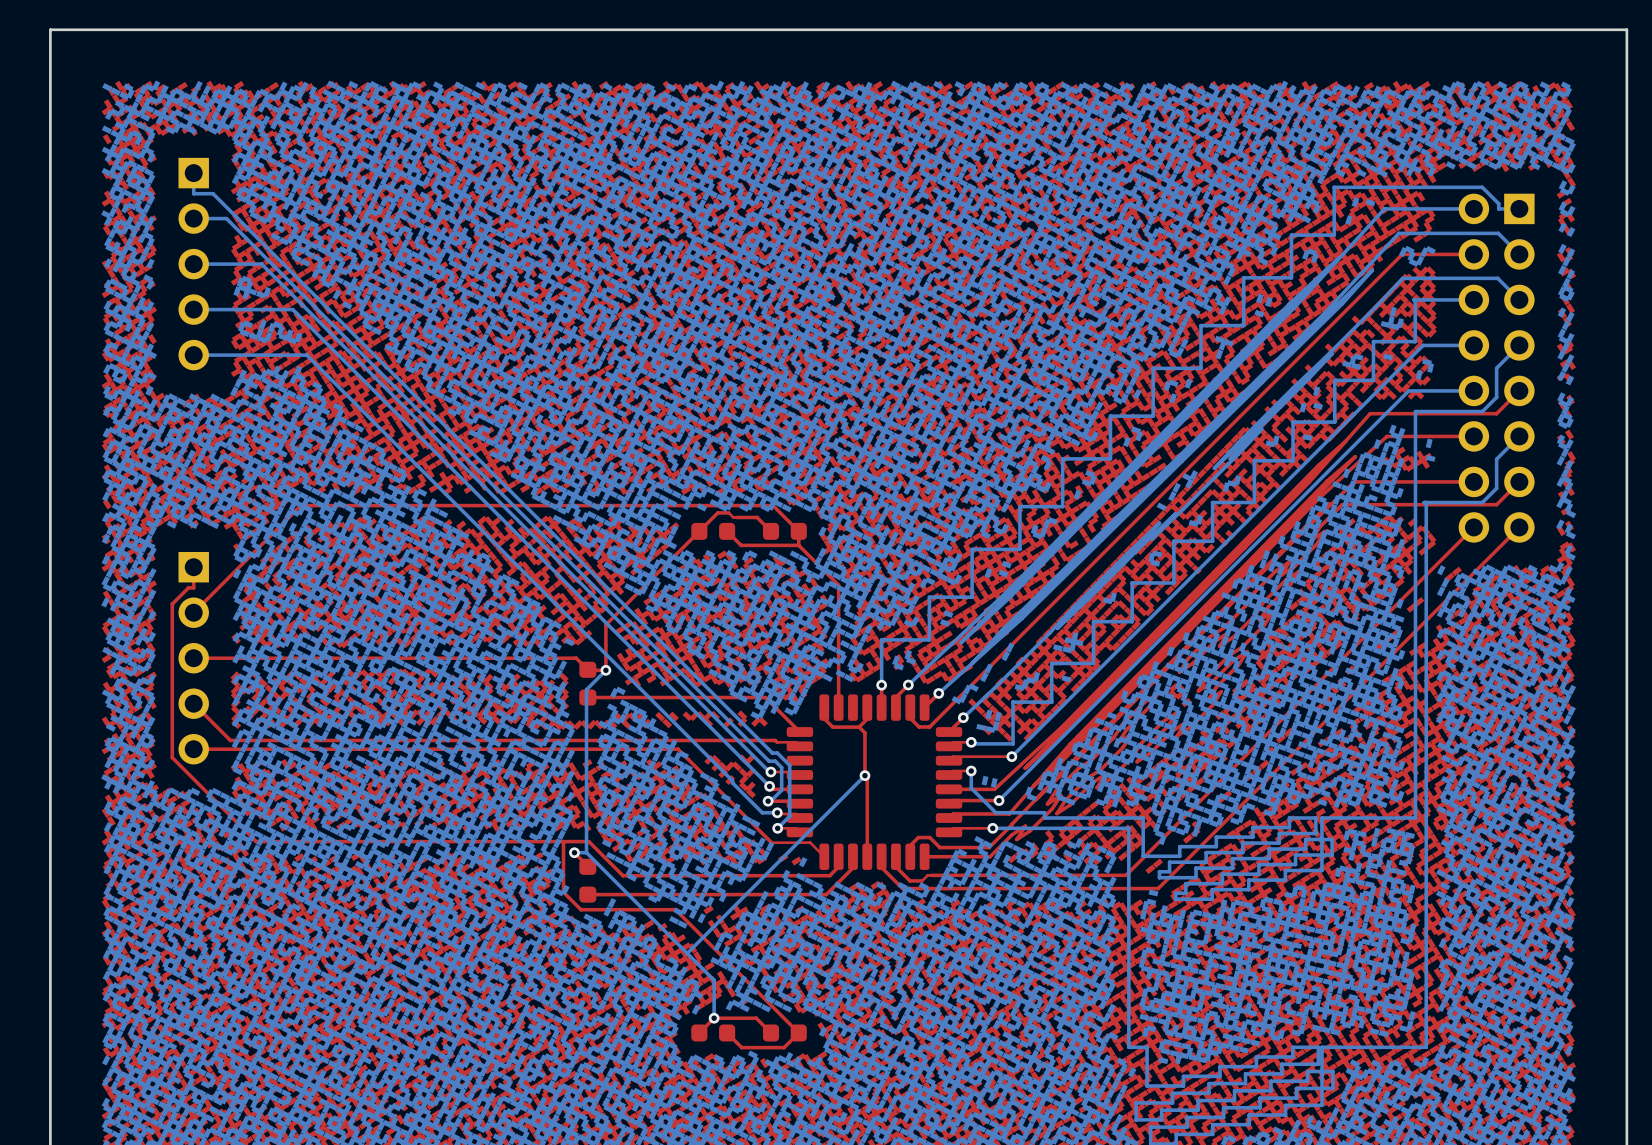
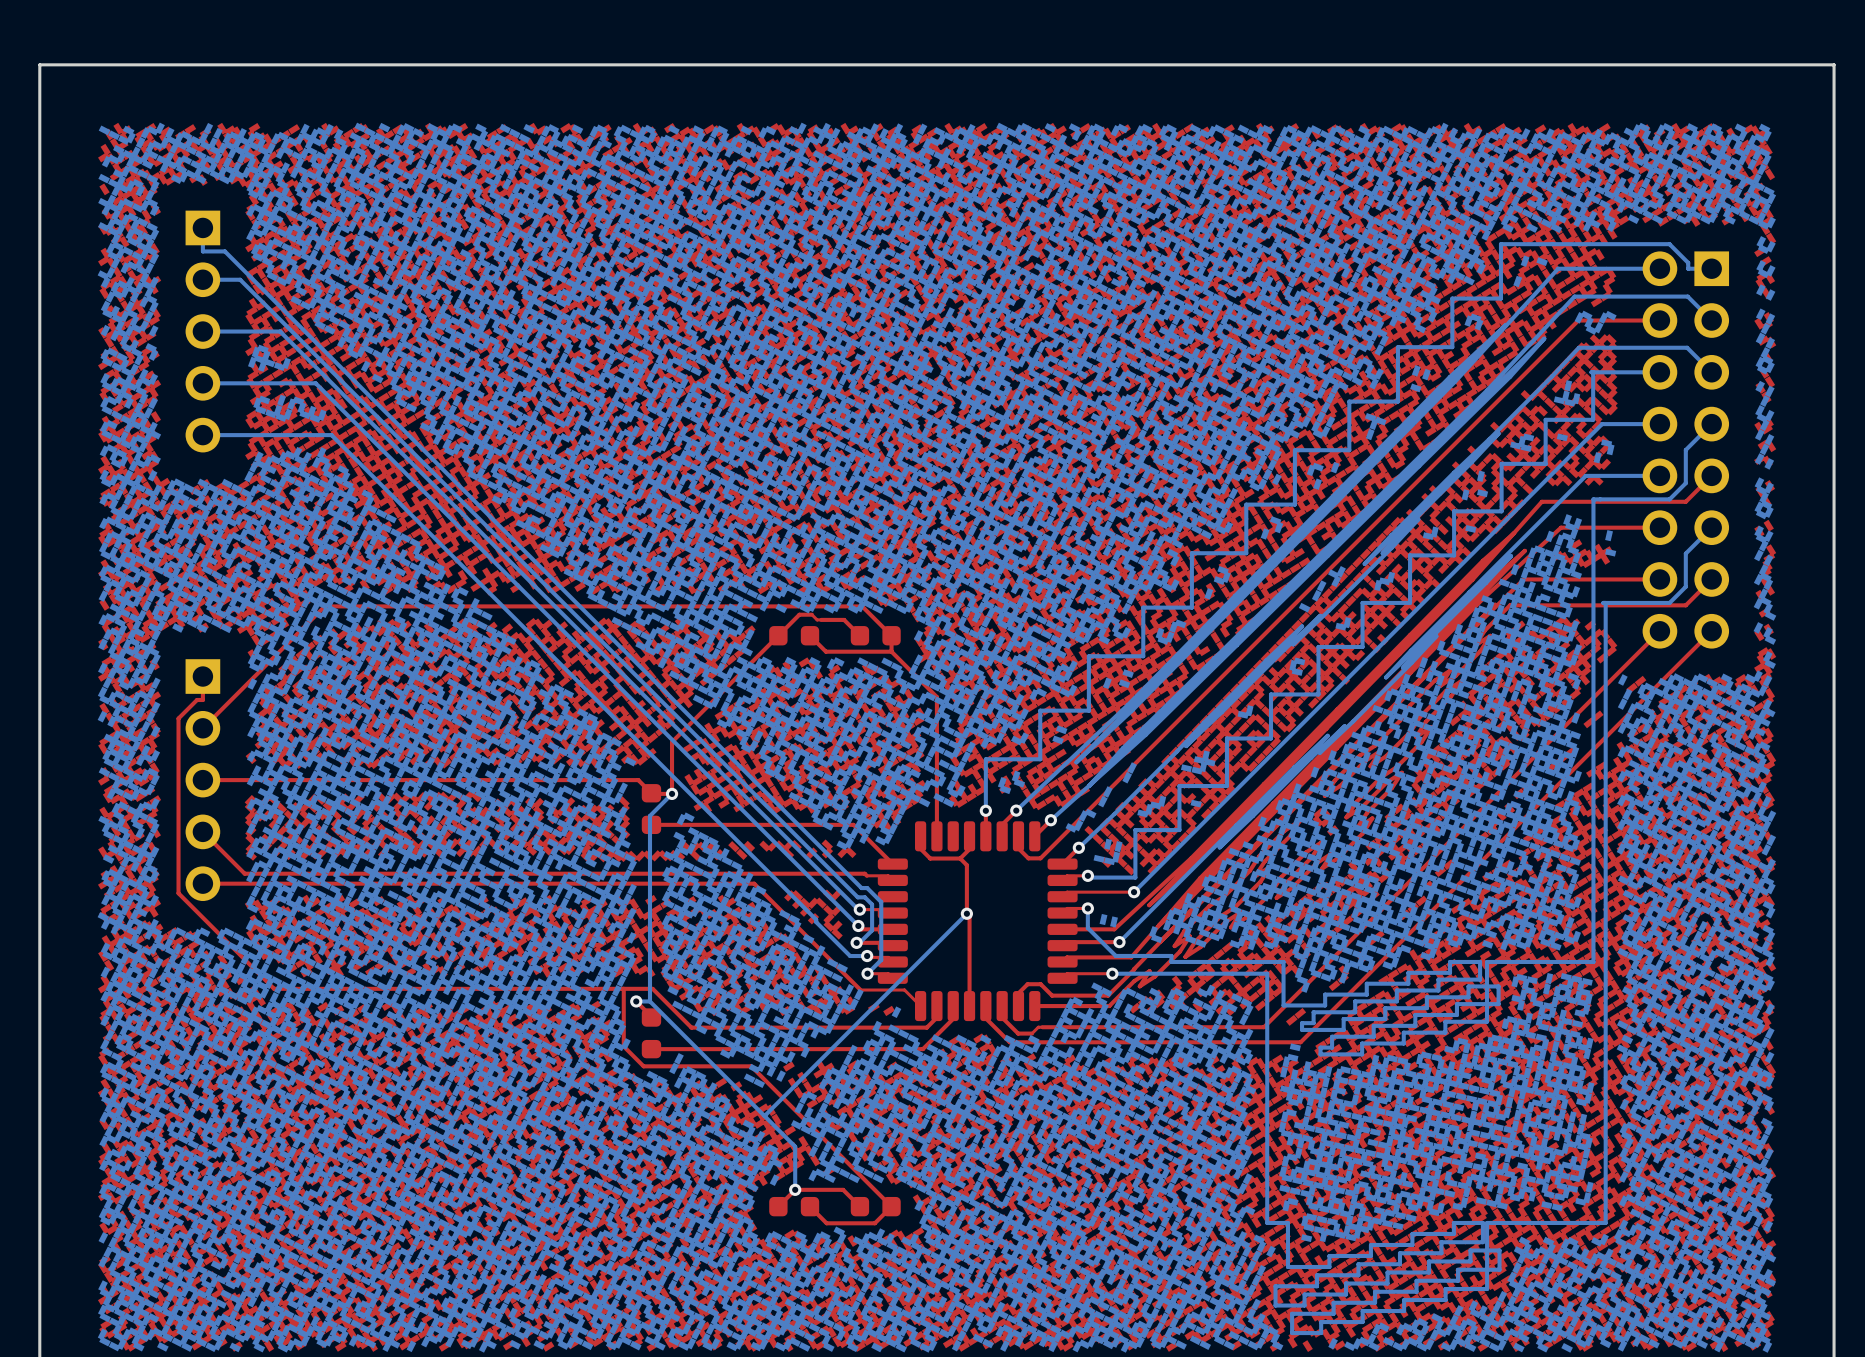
drawing shape: [1388, 454, 1396, 465] -> [1567, 546, 1580, 556]
drawing shape: [1390, 475, 1399, 486] -> [1570, 570, 1583, 580]
bottom track: (1255, 544) (1152, 646) -> (1410, 650) (1386, 677) (1511, 556) (1403, 667) (1436, 636) (1411, 663) (1353, 721) (1319, 752) (1344, 726) (1219, 847) (1327, 735) (1294, 767)

